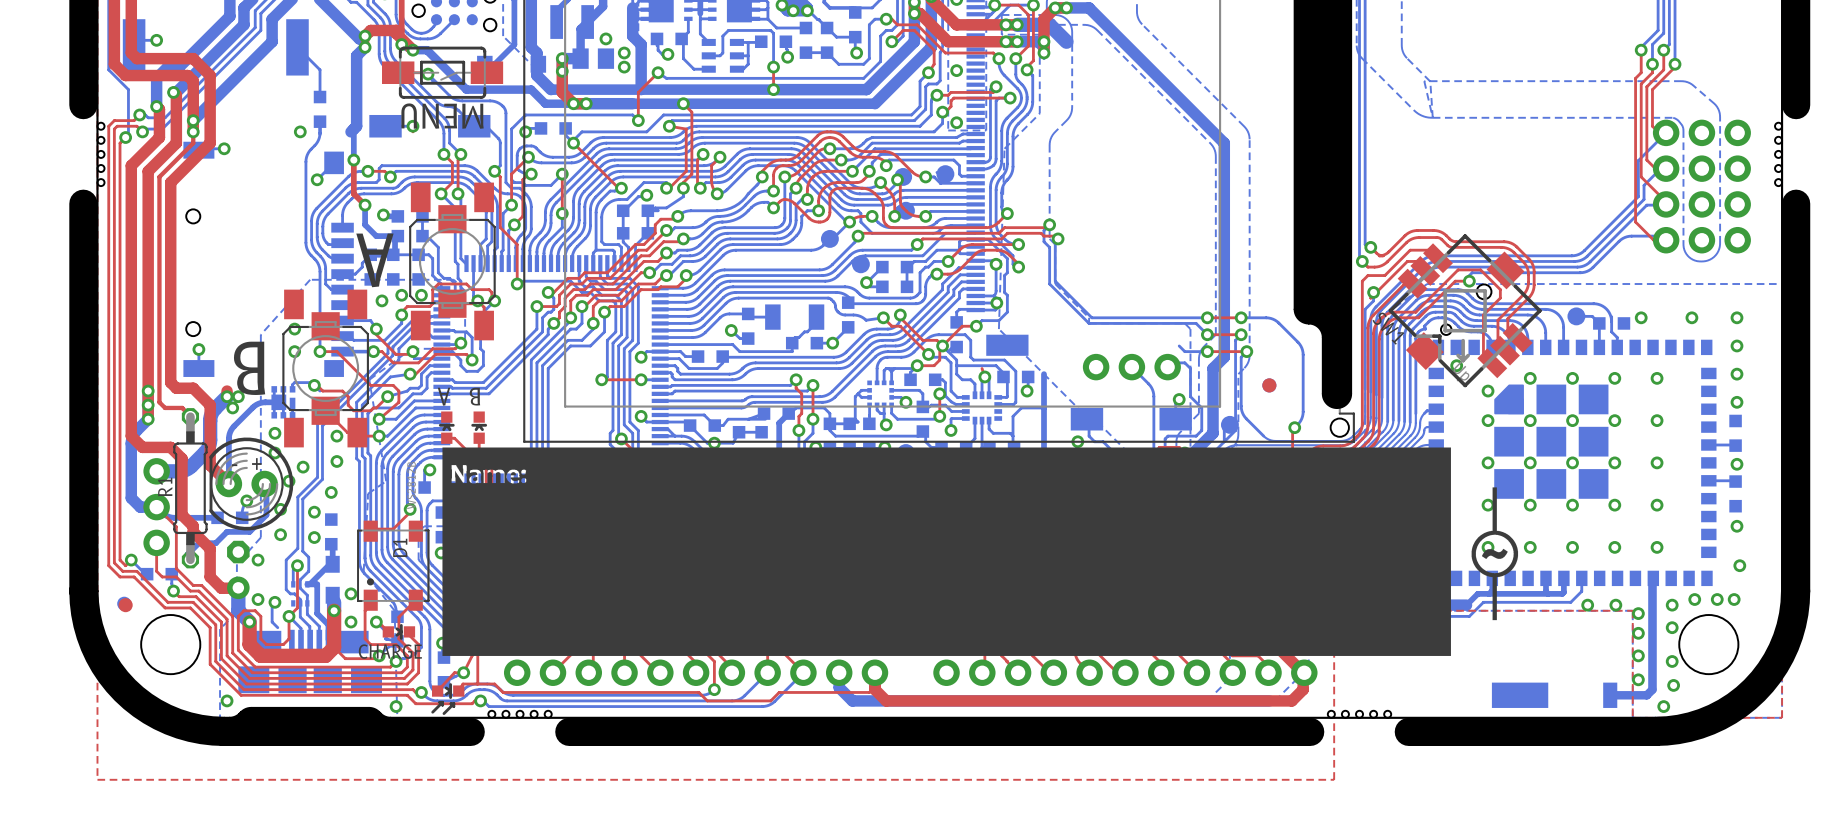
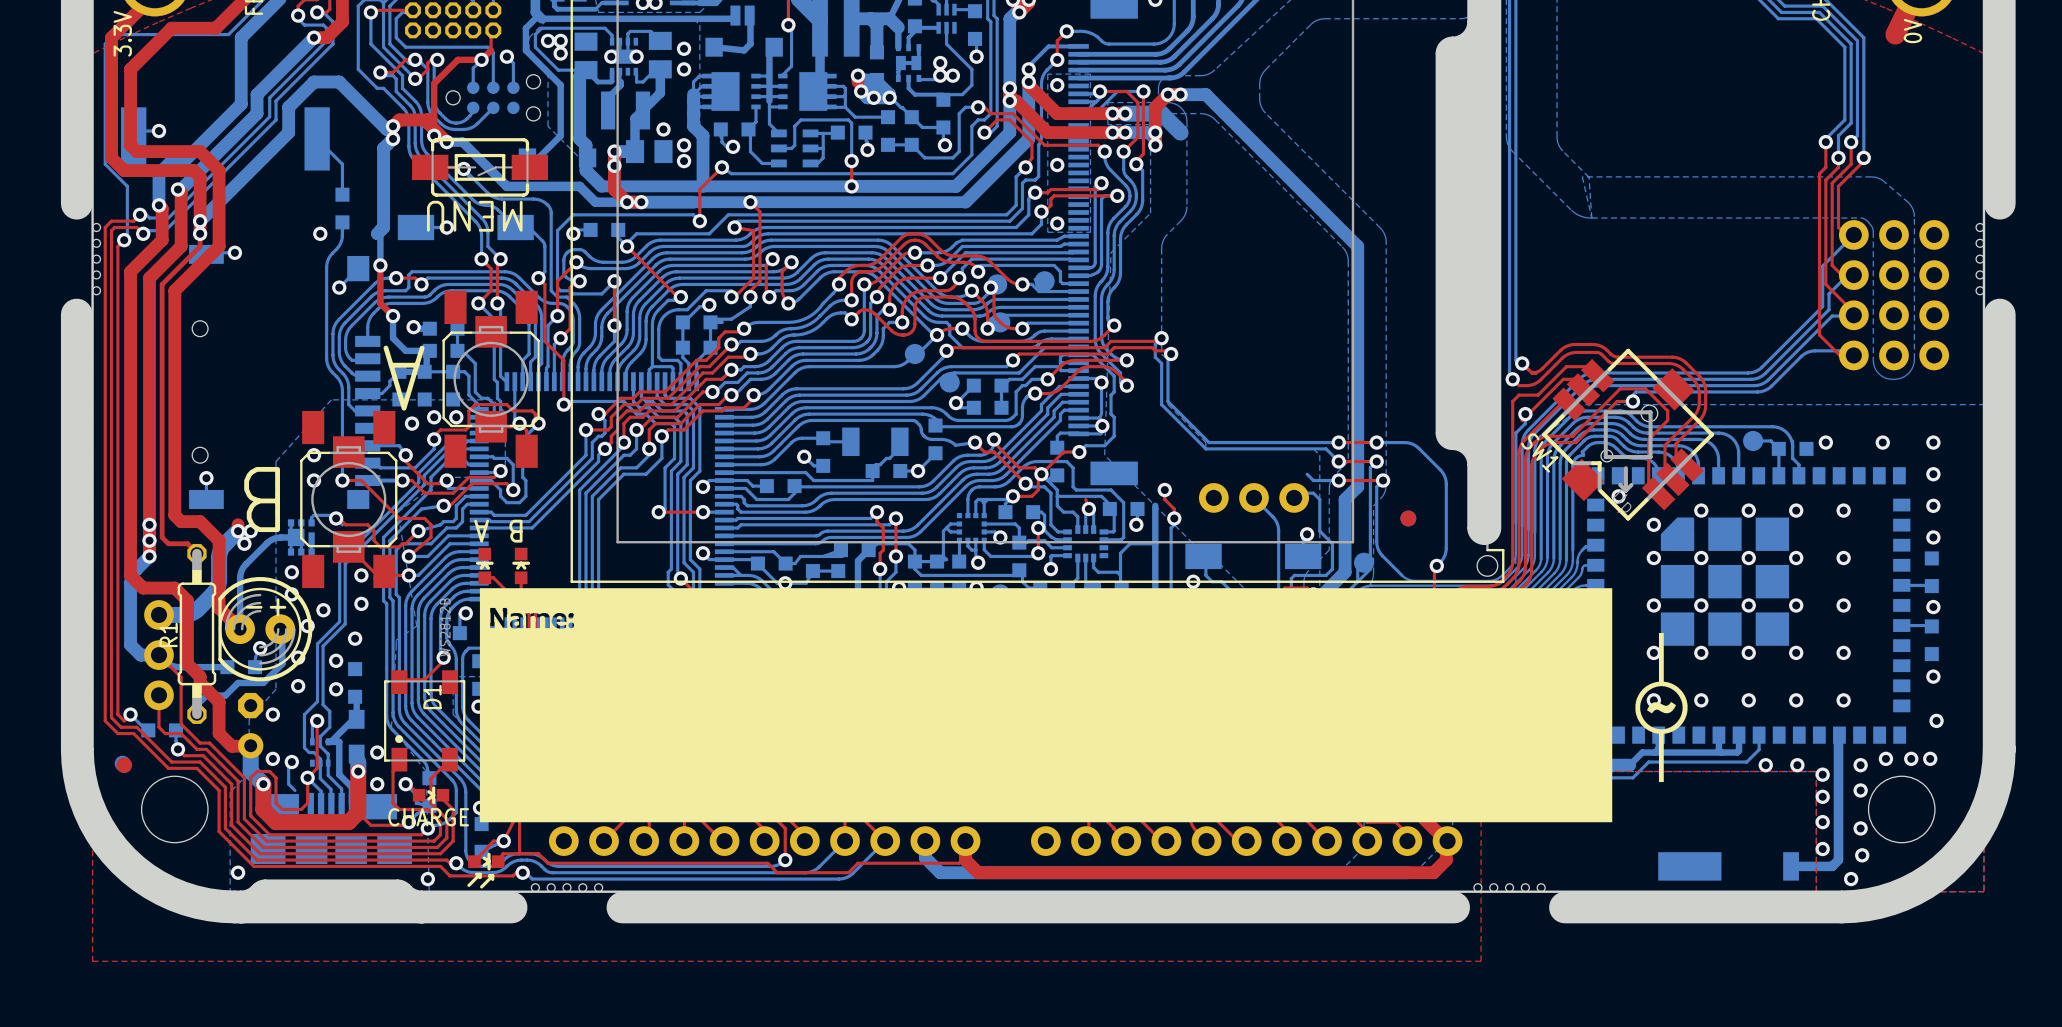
top track: none -> (1164, 490) (1164, 499) (1174, 508) (1174, 518)
via: none -> (1164, 490)
bottom track: none -> (1174, 518) (1174, 524) (1171, 527) (1171, 619) (1178, 627) (1191, 627)
via: none -> (1174, 518)

